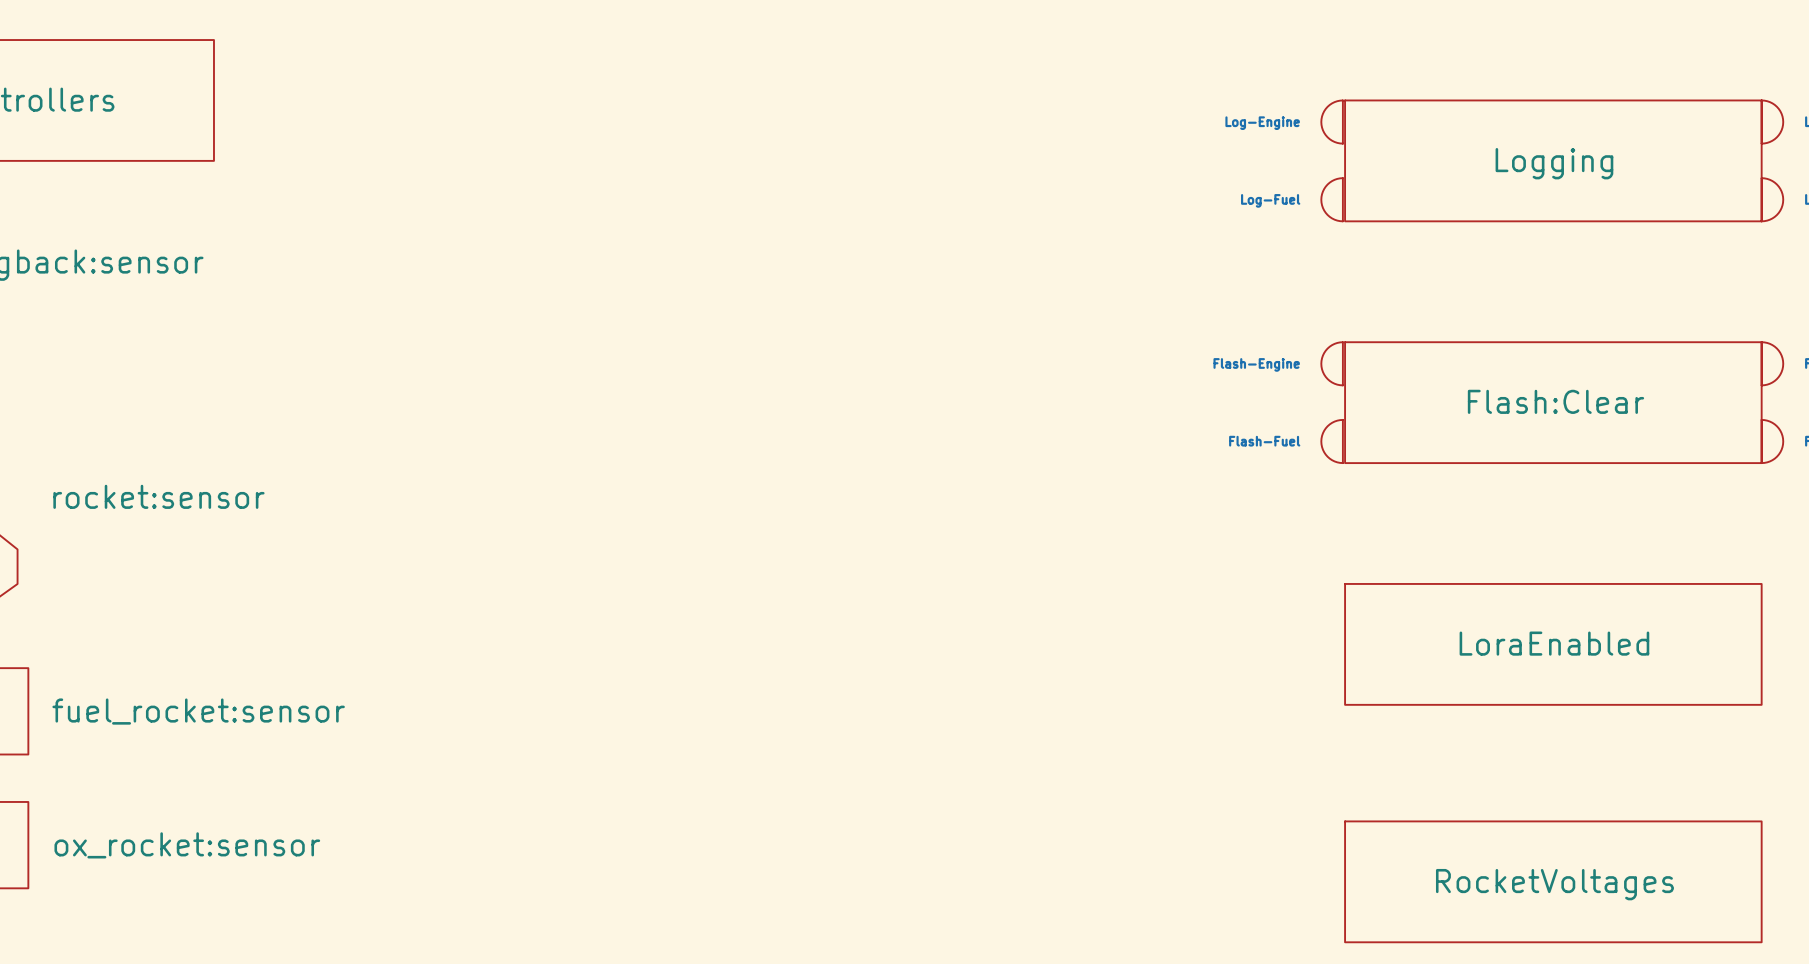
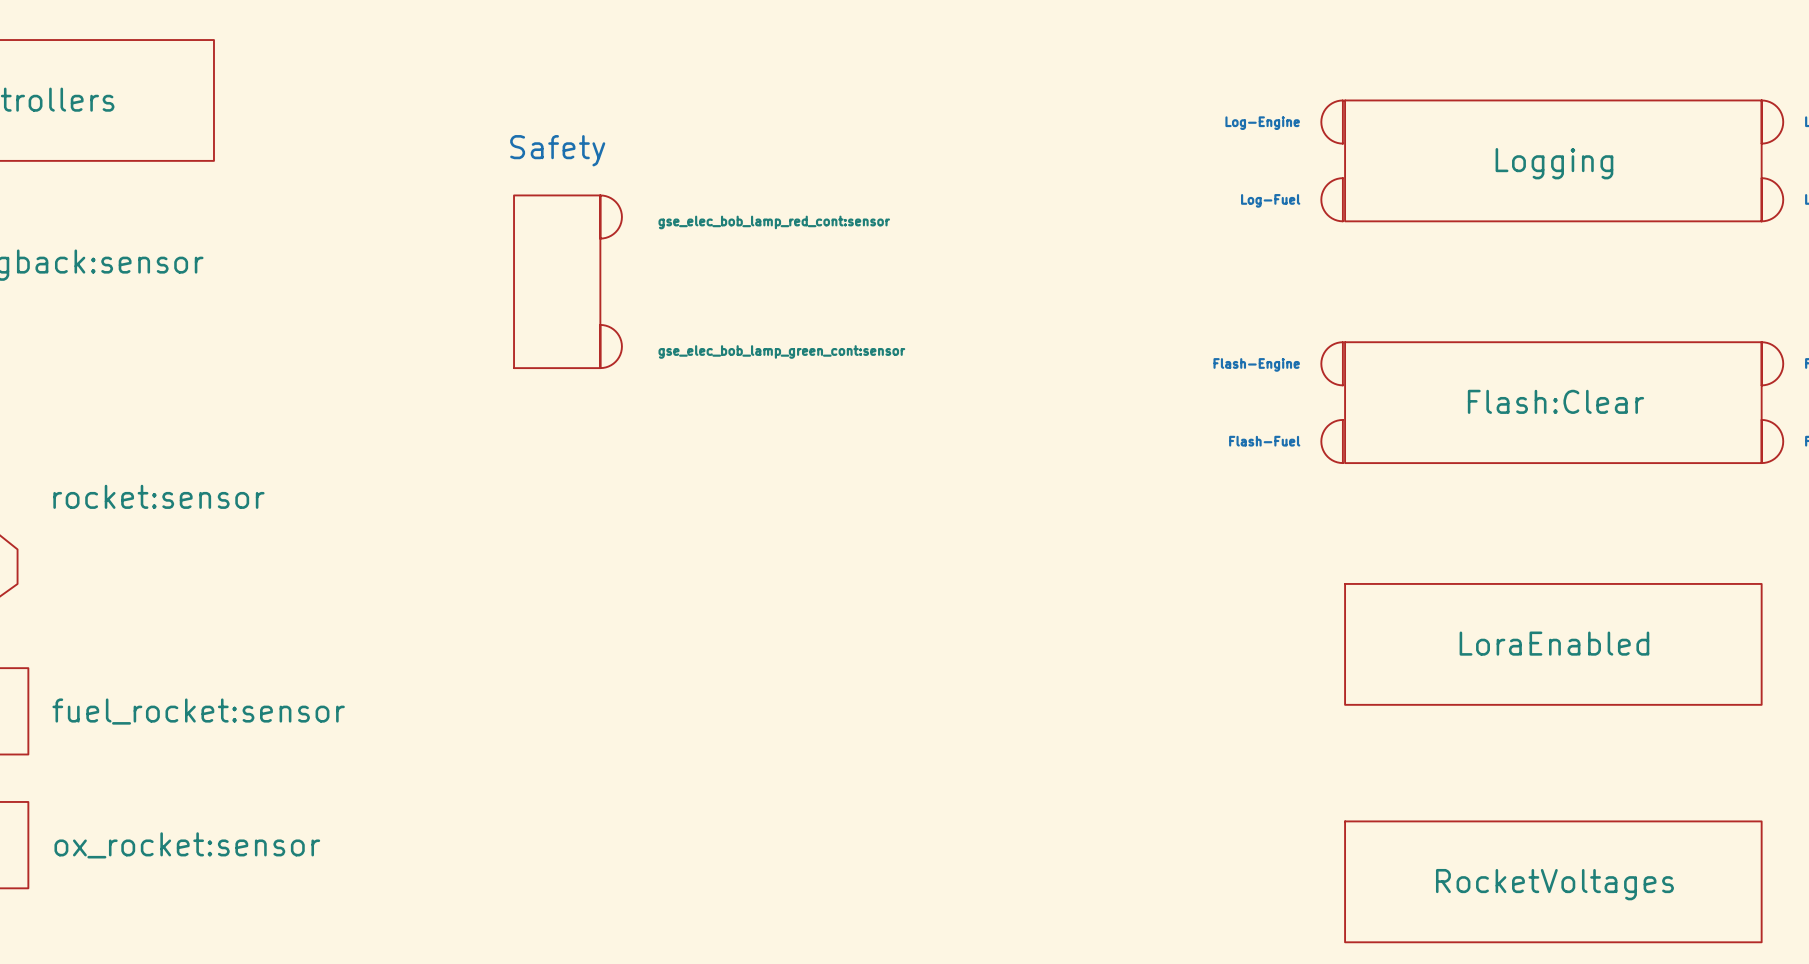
part: none -> gse_elec_bob_lamp_red_cont:sensor (611, 217)
Safety: none -> (557, 281)
part: none -> gse_elec_bob_lamp_green_cont:sensor (611, 346)

